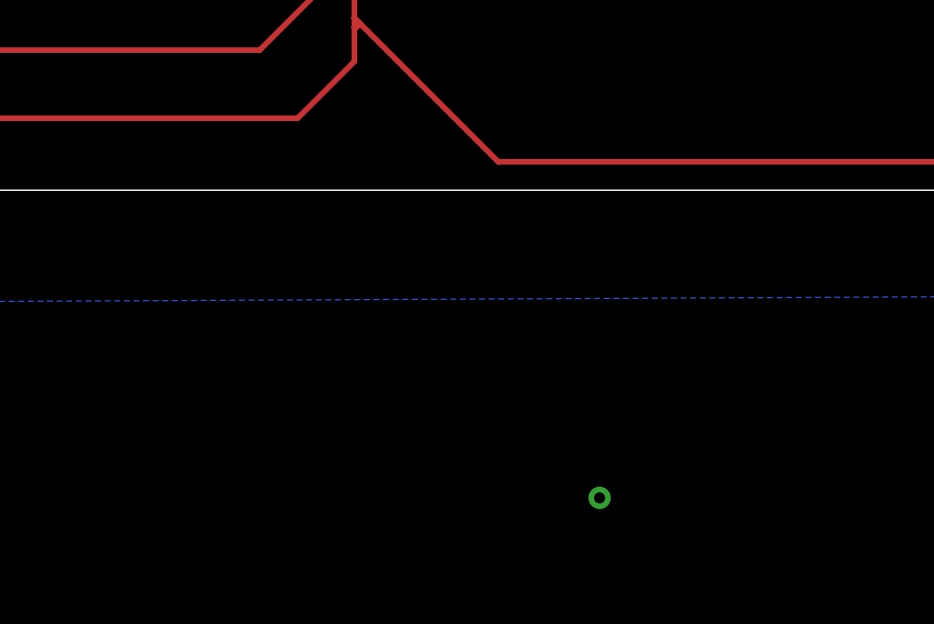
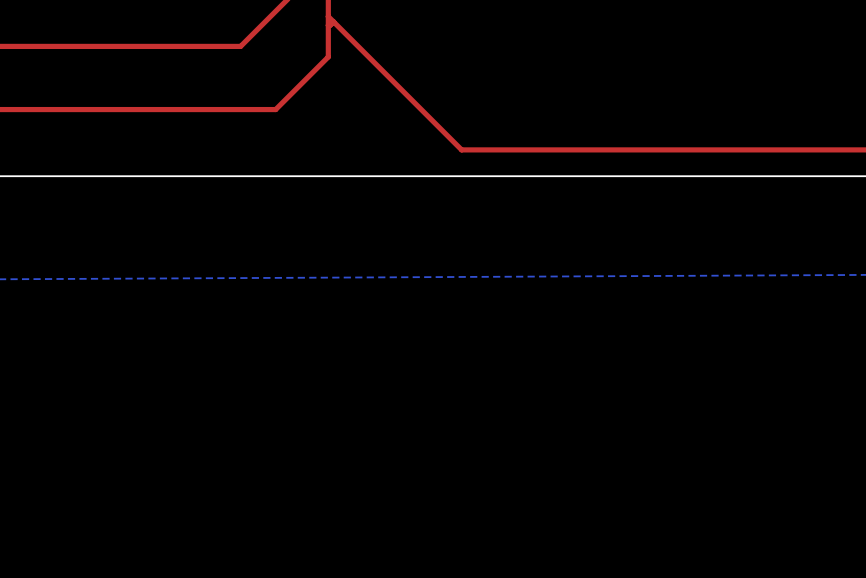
part: (599, 497) -> none

